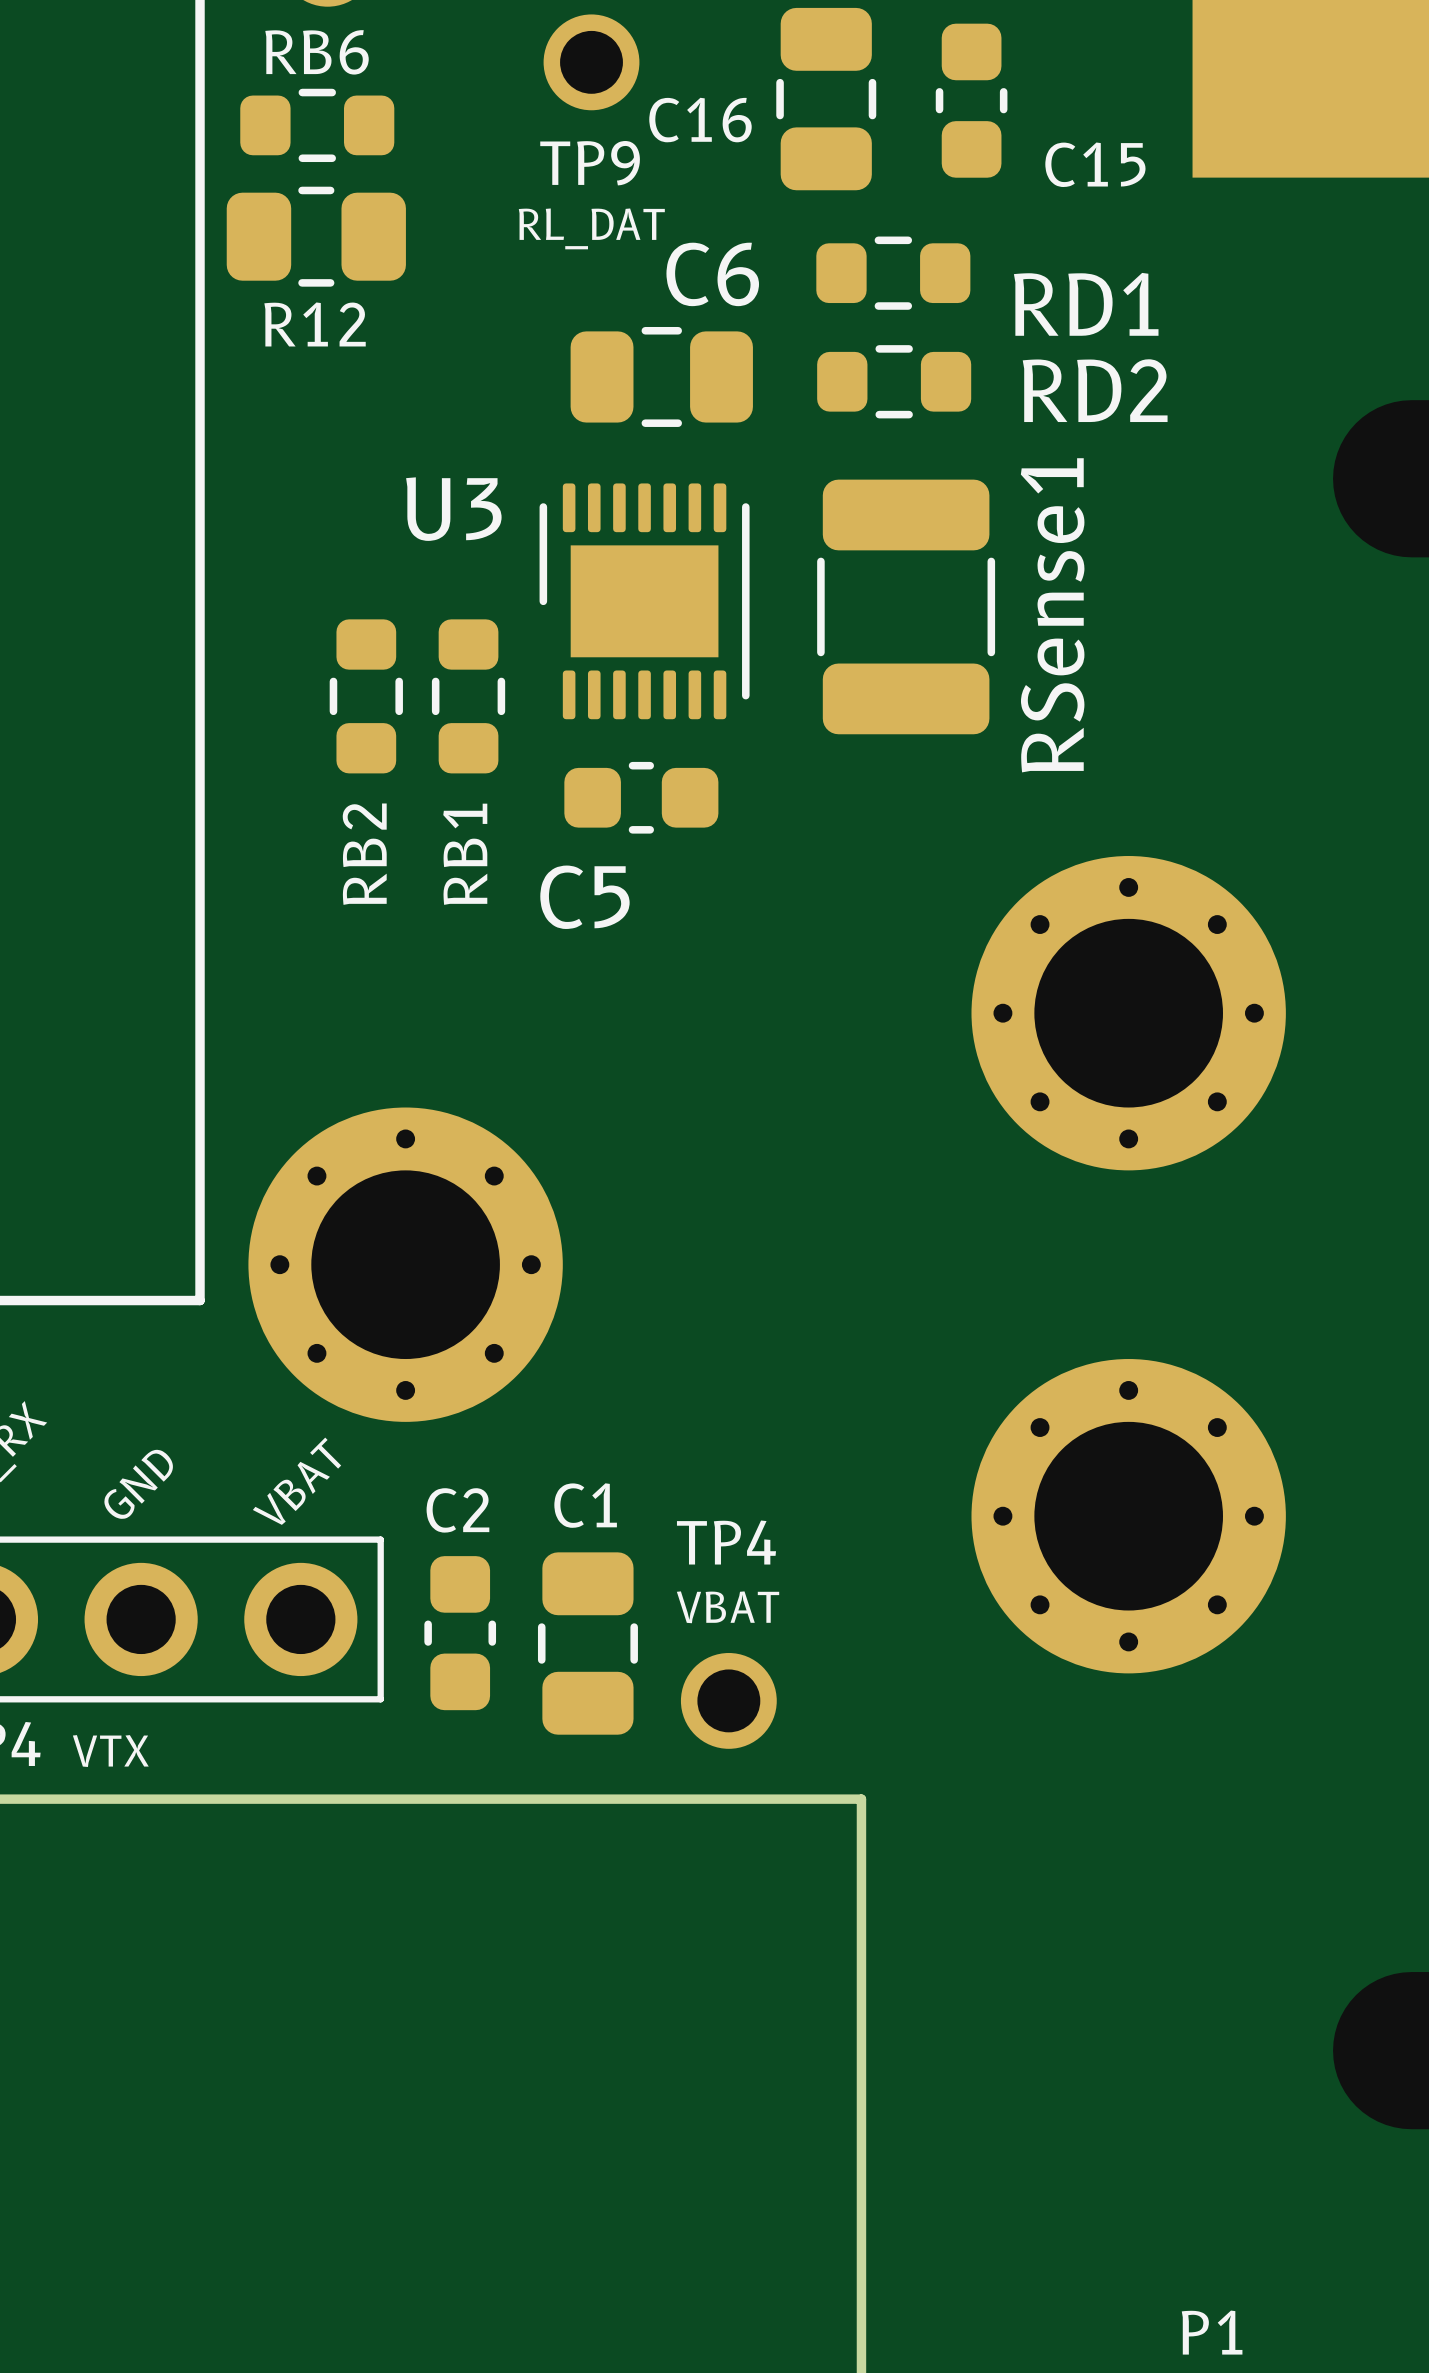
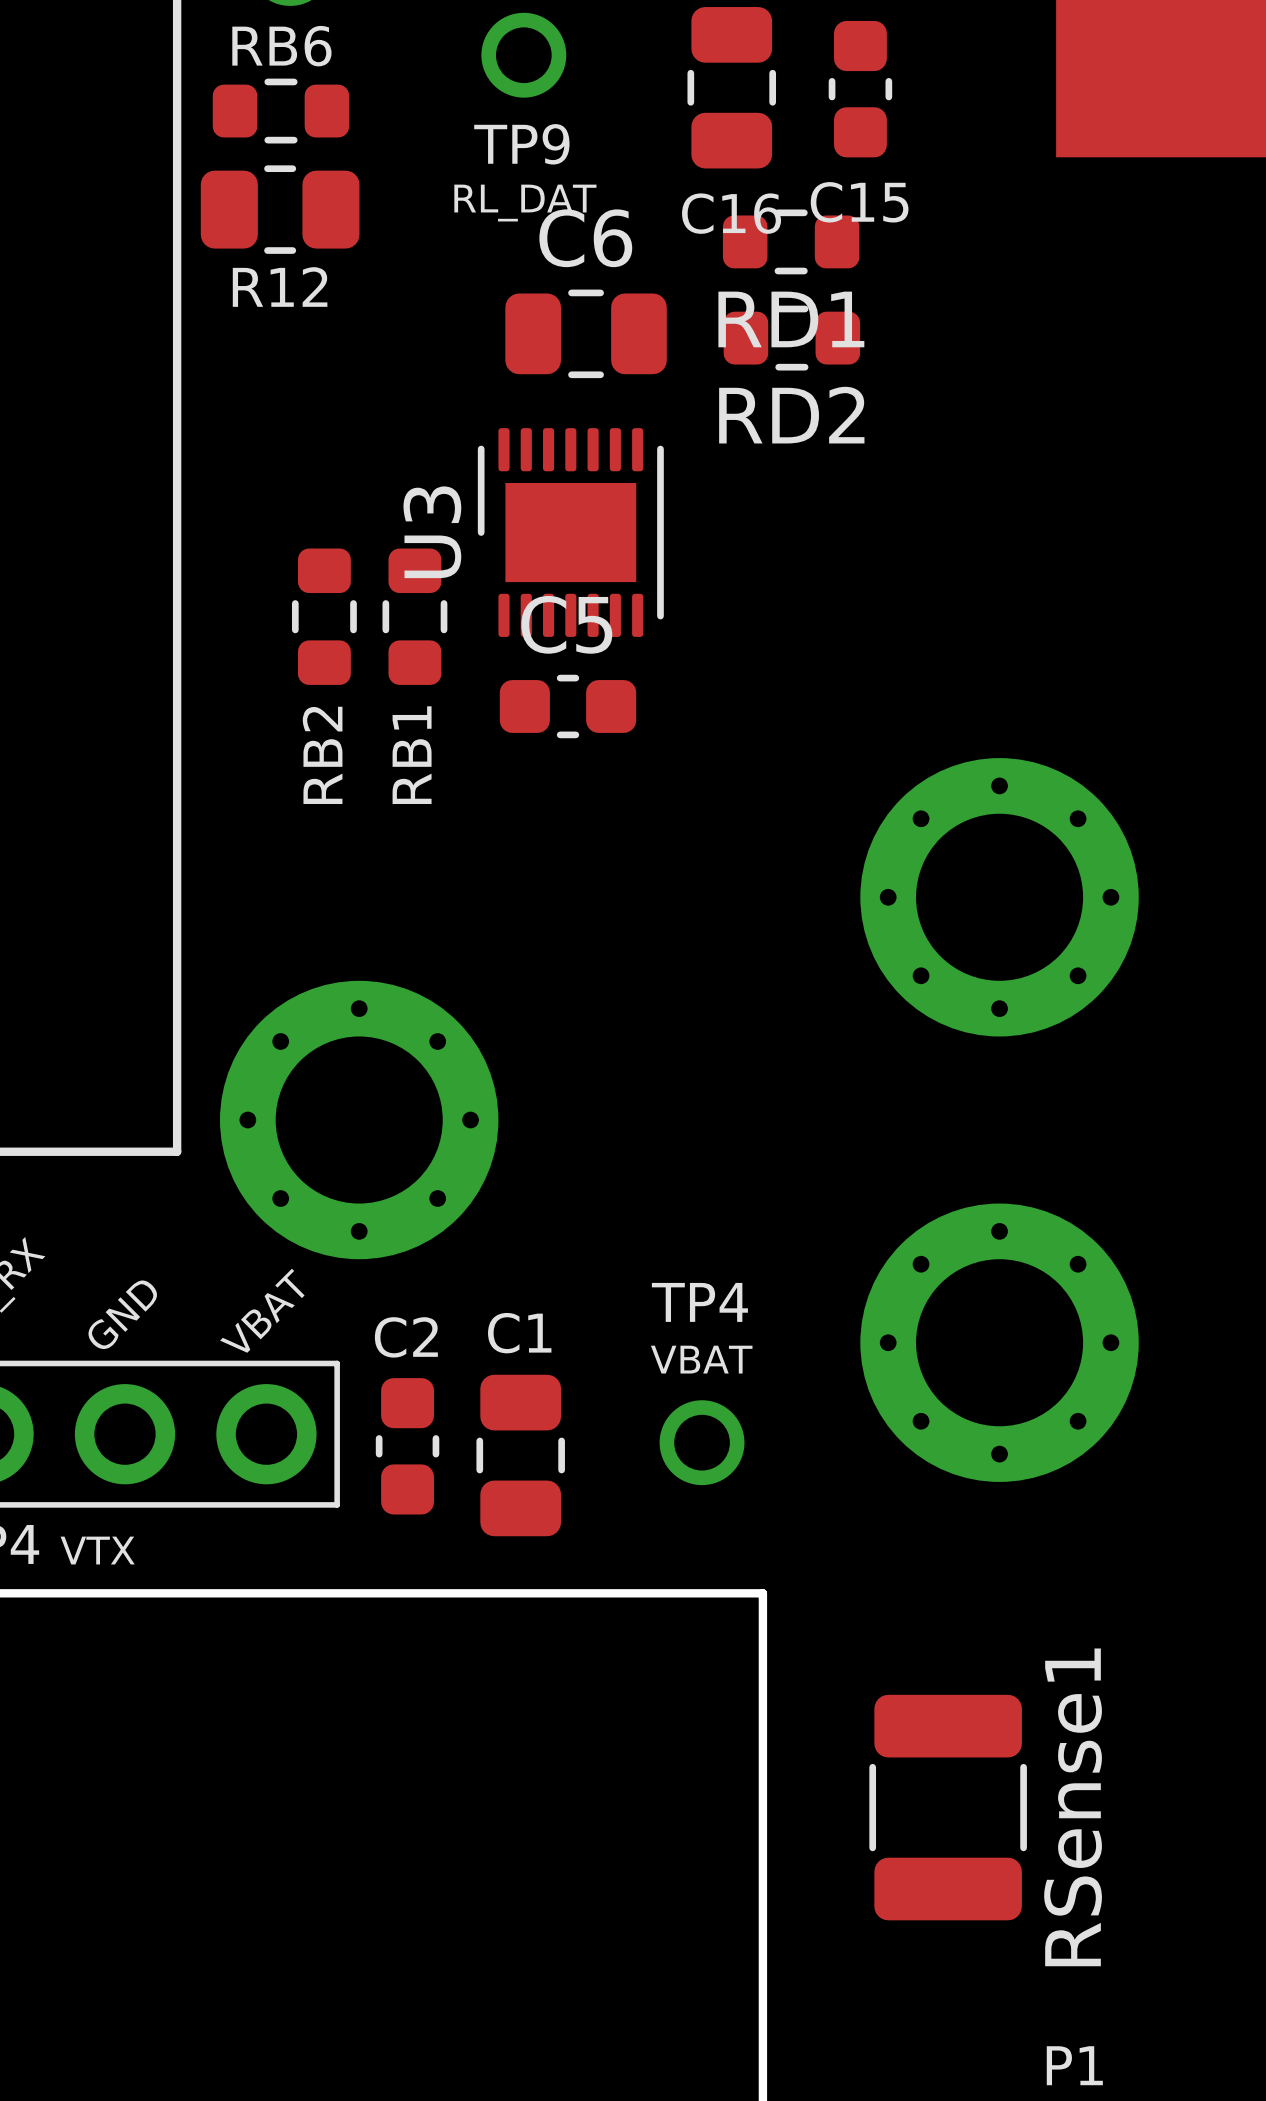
C16 name position: C16 (700, 120) -> C16 (731, 213)
C15 name position: C15 (1095, 164) -> C15 (859, 202)
C6 name position: C6 (712, 274) -> C6 (585, 238)
RD1 name position: RD1 (1086, 304) -> RD1 (791, 319)
RD2 name position: RD2 (1095, 390) -> RD2 (791, 415)
U3 name rotation: 0° (453, 509) -> 90° counterclockwise (432, 532)
RSense1 position: (906, 606) -> (948, 1807)
RSense1 name position: RSense1 (1052, 615) -> RSense1 (1073, 1807)
C5 name position: C5 (584, 897) -> C5 (566, 624)
TP4 position: (728, 1700) -> (702, 1442)

